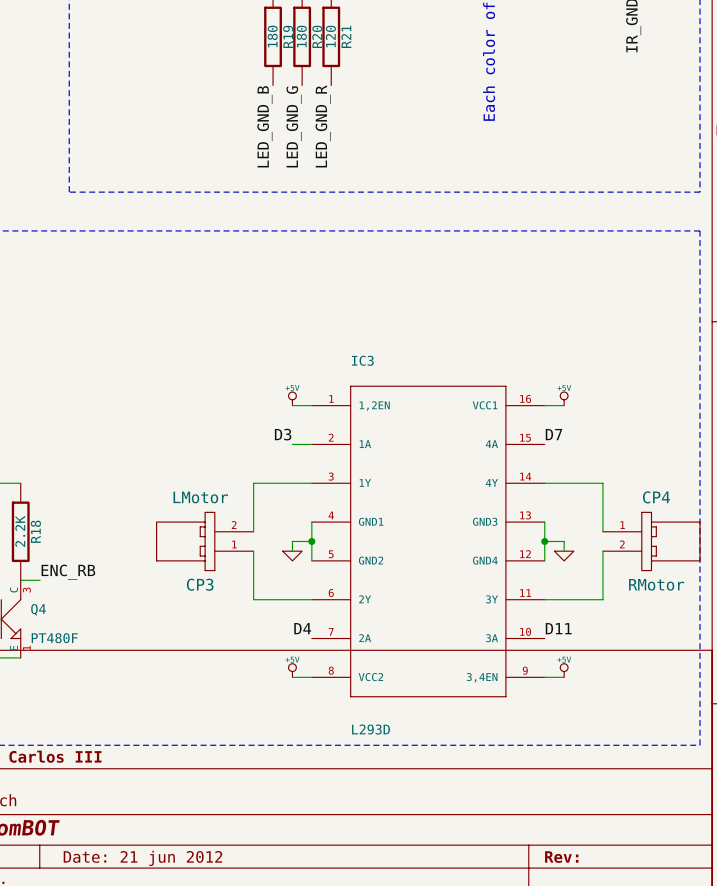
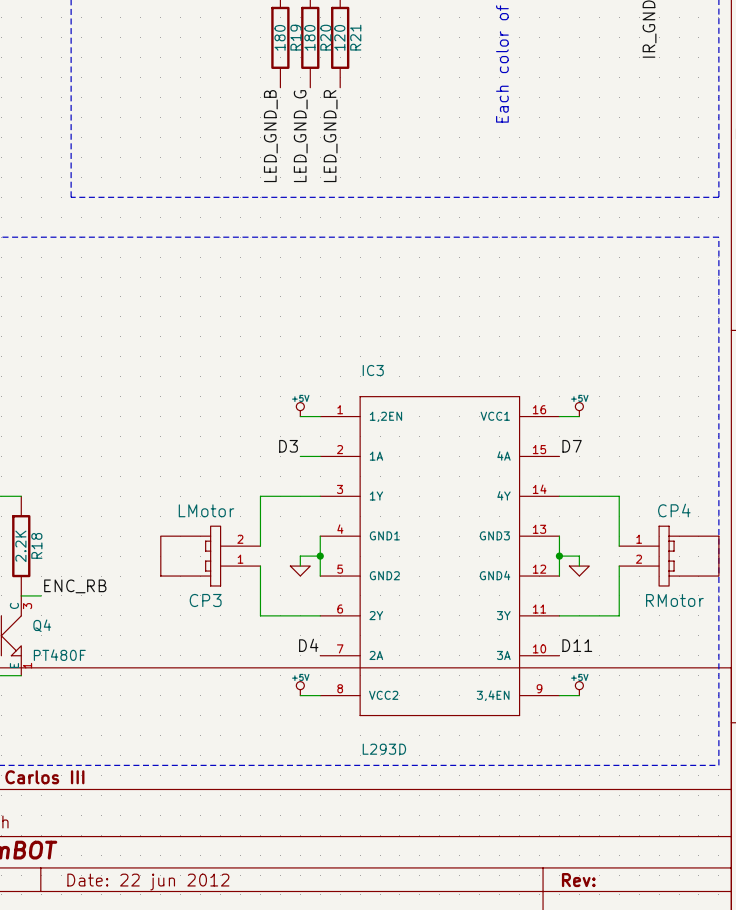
title block: Date: 21 jun 2012 (142, 858) -> Date: 22 jun 2012 (148, 882)

